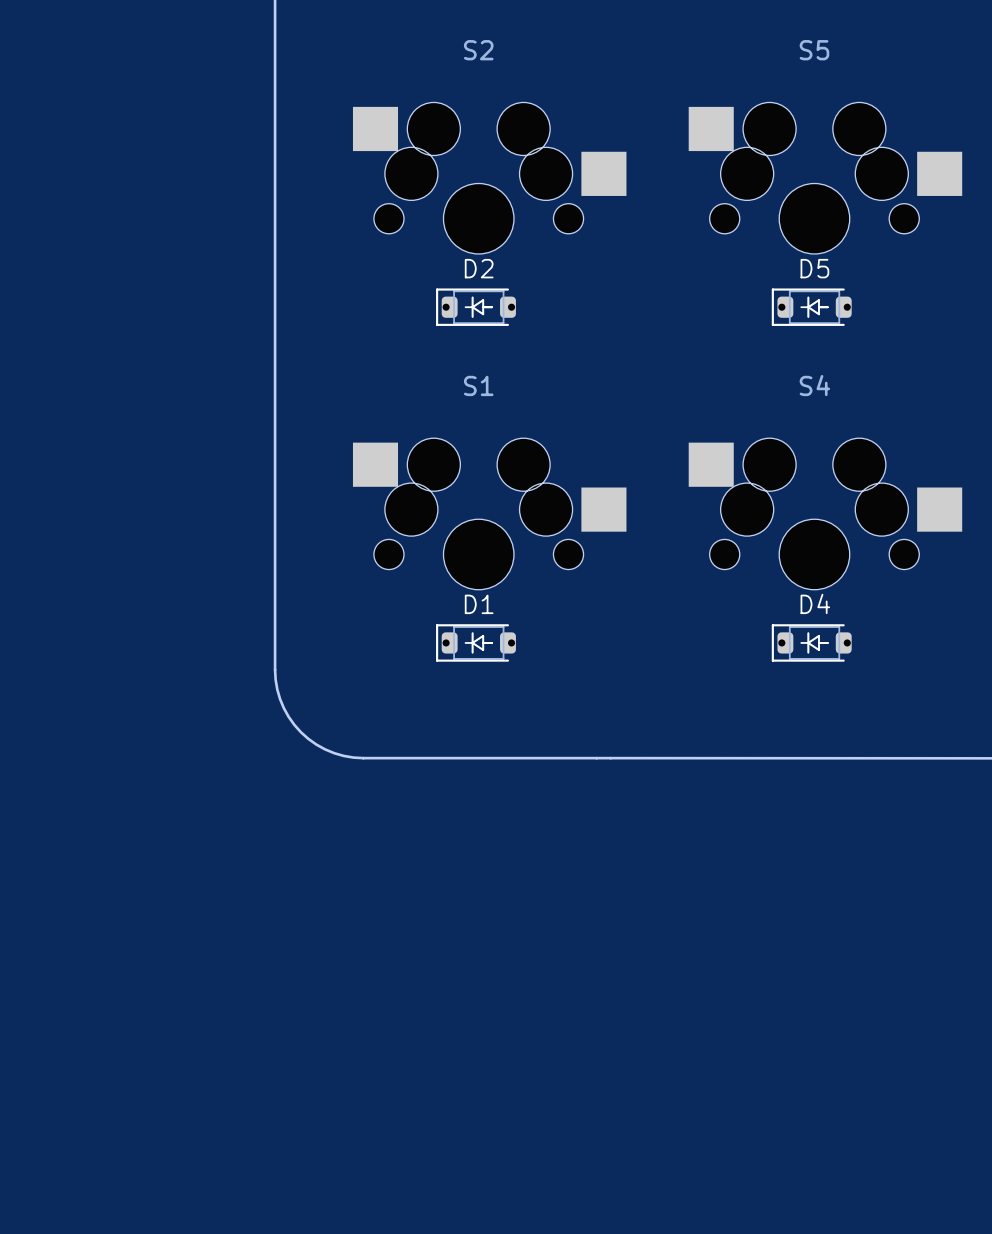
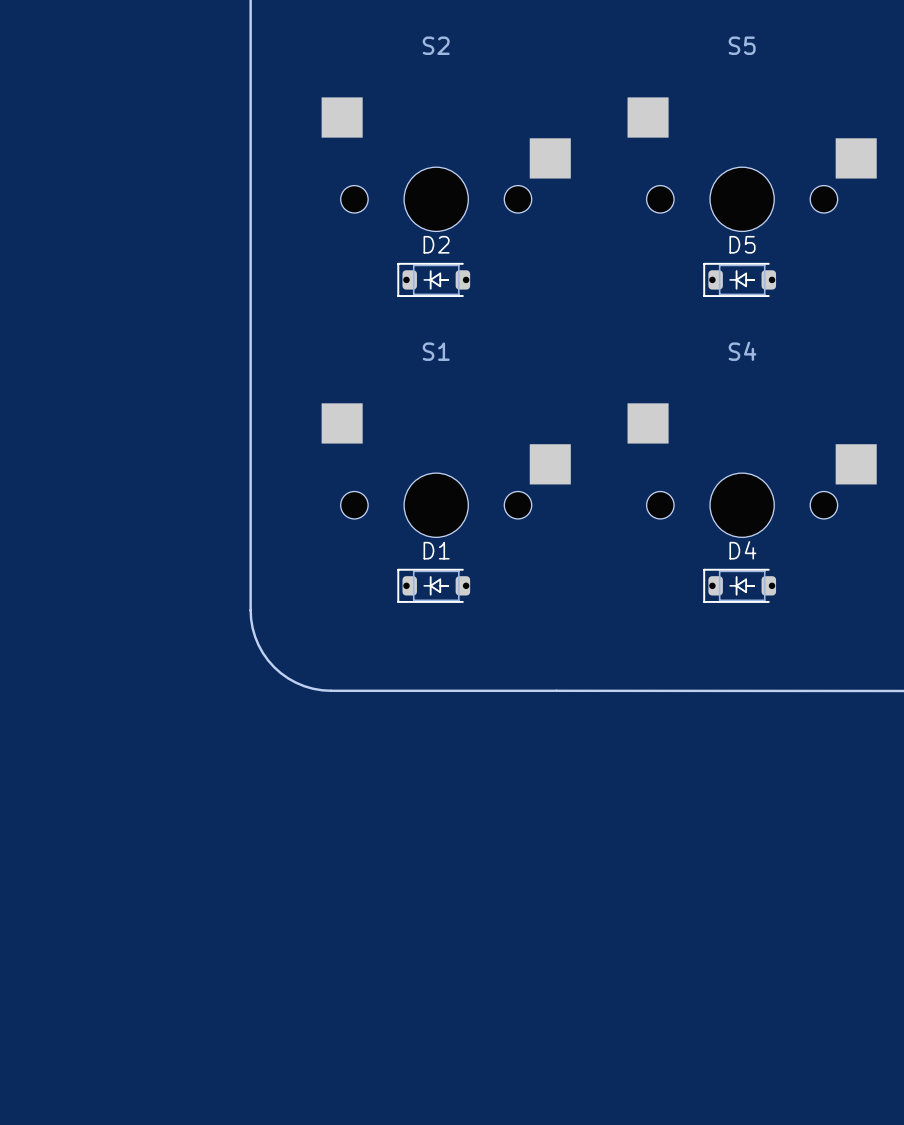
S2 footprint: [352, 102, 627, 254] -> [321, 97, 571, 232]
S5 footprint: [688, 102, 963, 254] -> [627, 97, 877, 232]
S1 footprint: [352, 438, 627, 590] -> [321, 403, 571, 538]
S4 footprint: [688, 438, 963, 590] -> [627, 403, 877, 538]

